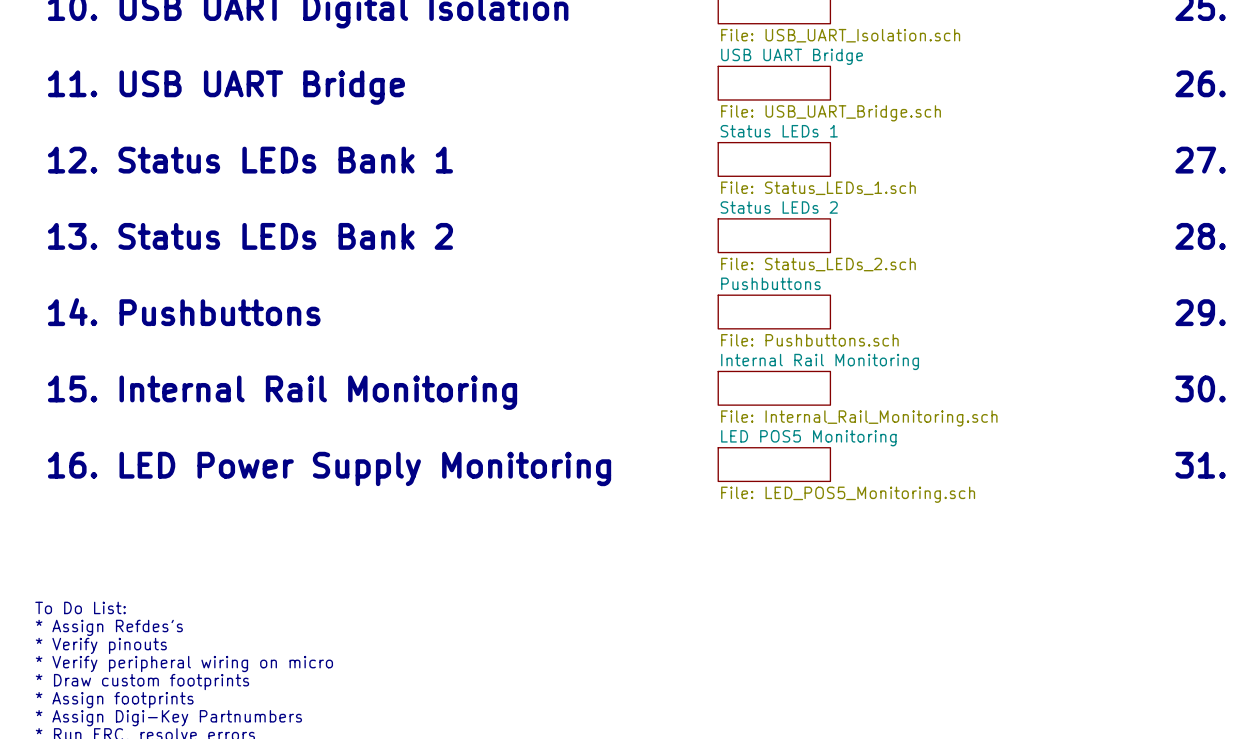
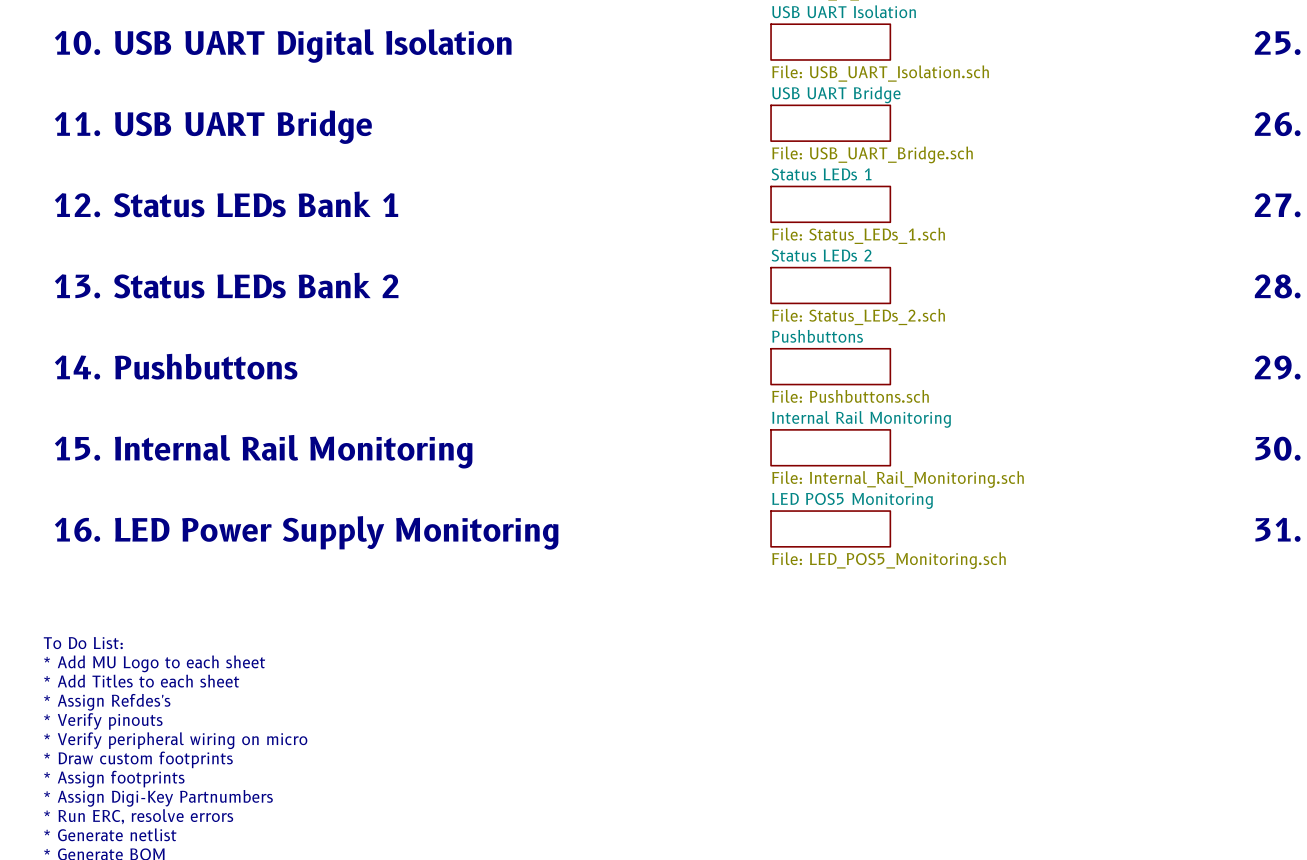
text: none -> To Do List: (83, 643)
text: none -> * Add MU Logo to each sheet (154, 663)
text: To Do List: (80, 607) -> * Add Titles to each sheet (141, 681)

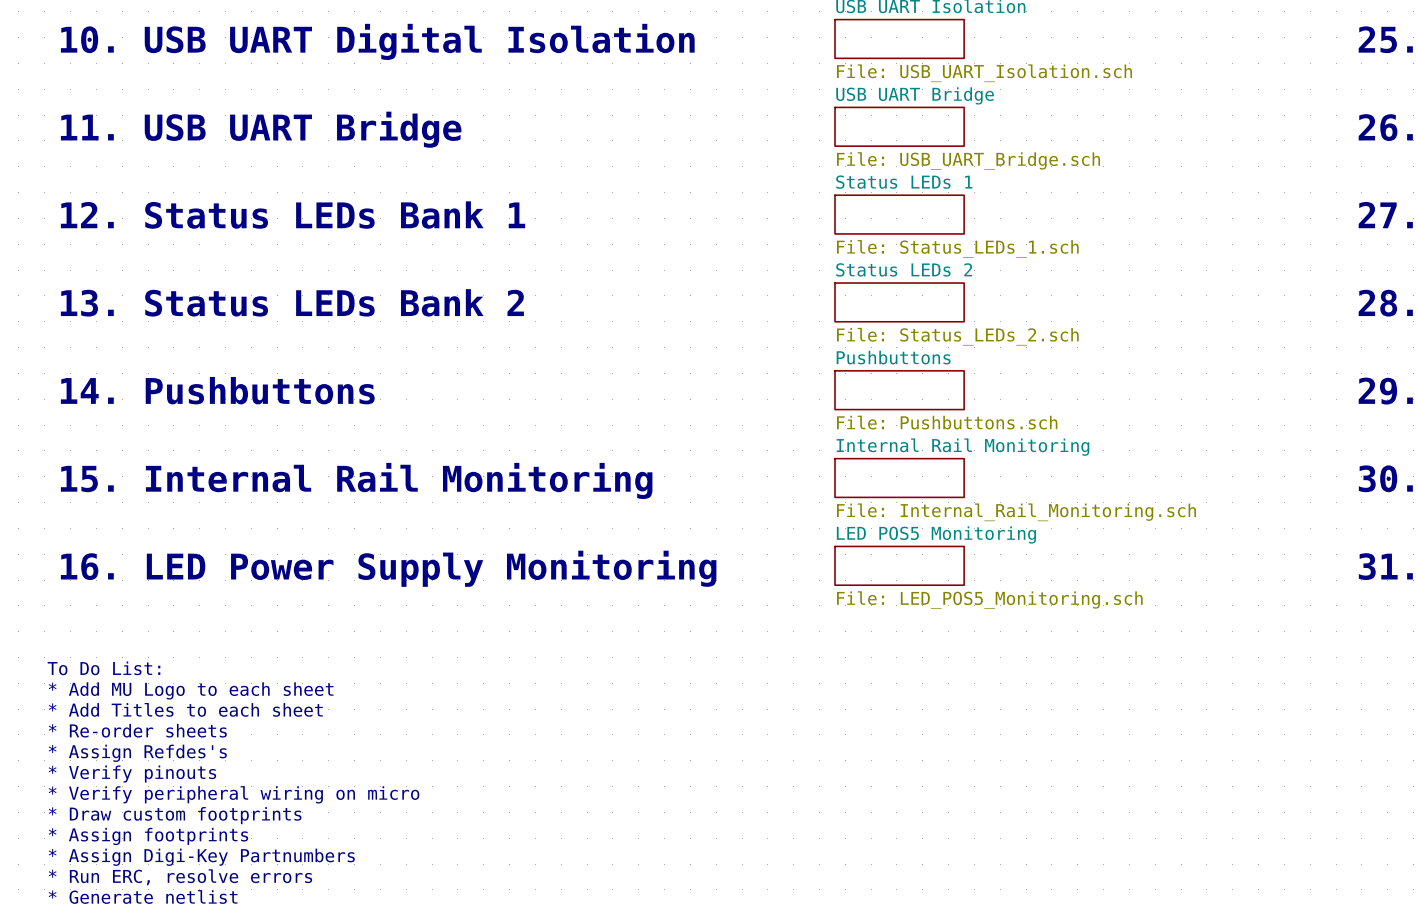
text: none -> To Do List: (104, 668)
text: To Do List: (83, 643) -> * Add MU Logo to each sheet (191, 690)
text: * Add MU Logo to each sheet (154, 663) -> * Add Titles to each sheet (185, 709)
text: * Add Titles to each sheet (141, 681) -> * Re-order sheets (137, 730)

